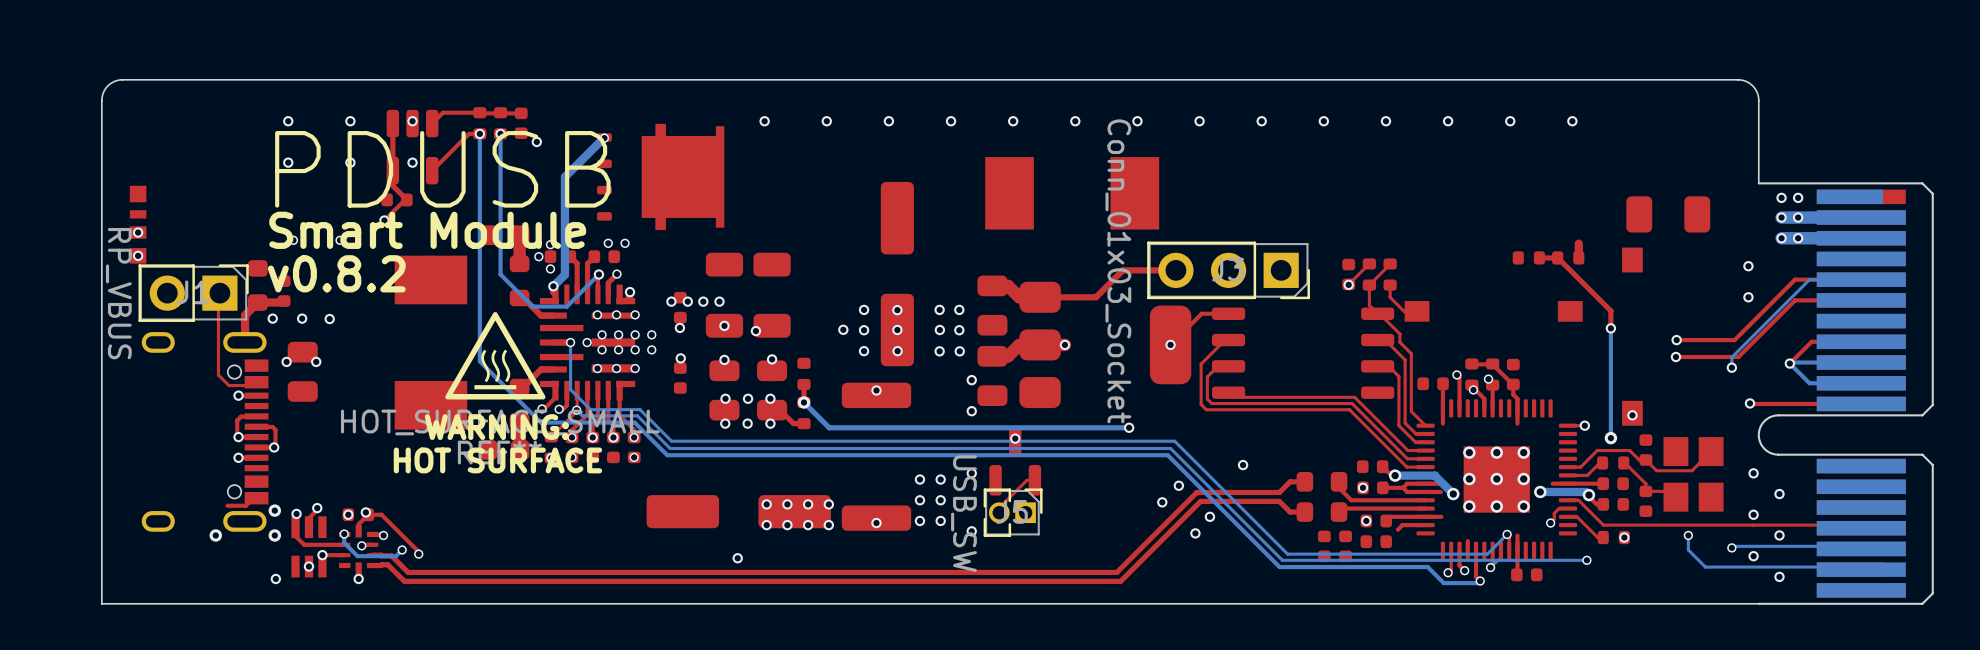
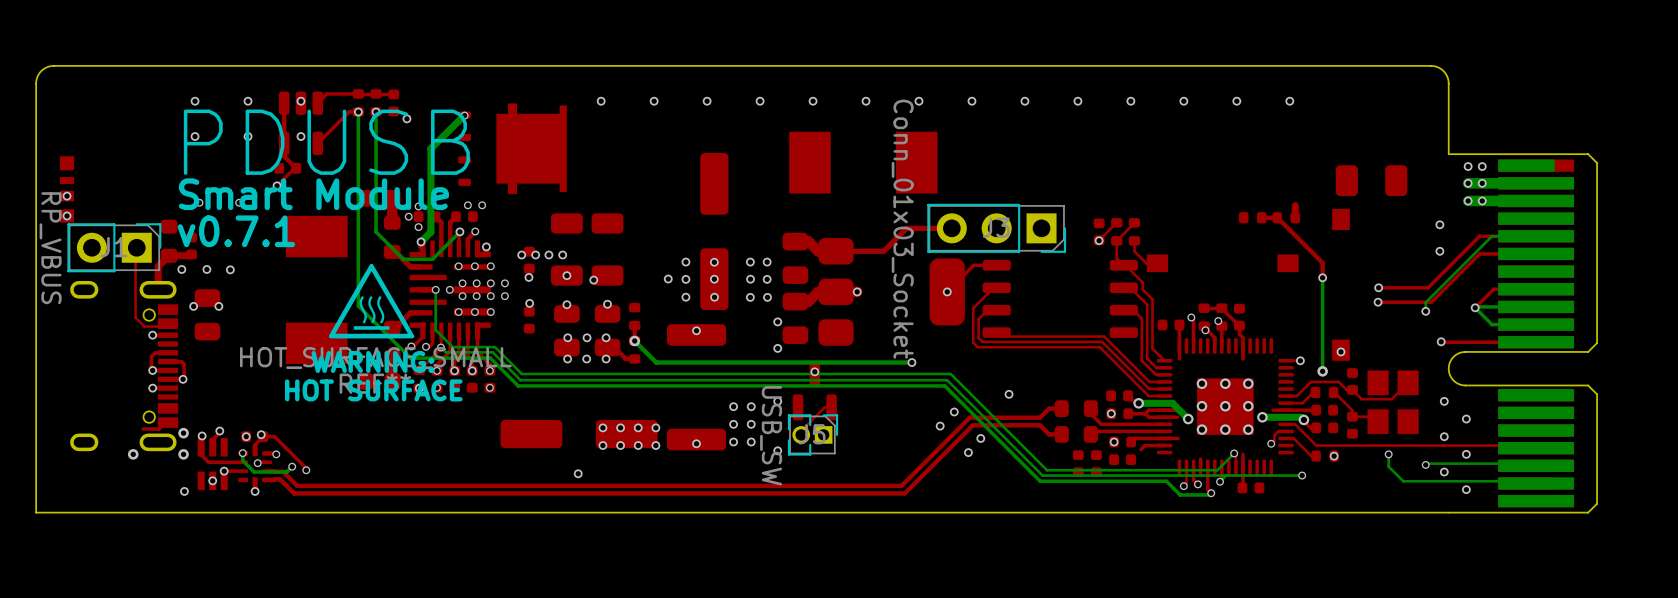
text: v0.8.2 (336, 273) -> v0.7.1 (236, 231)

